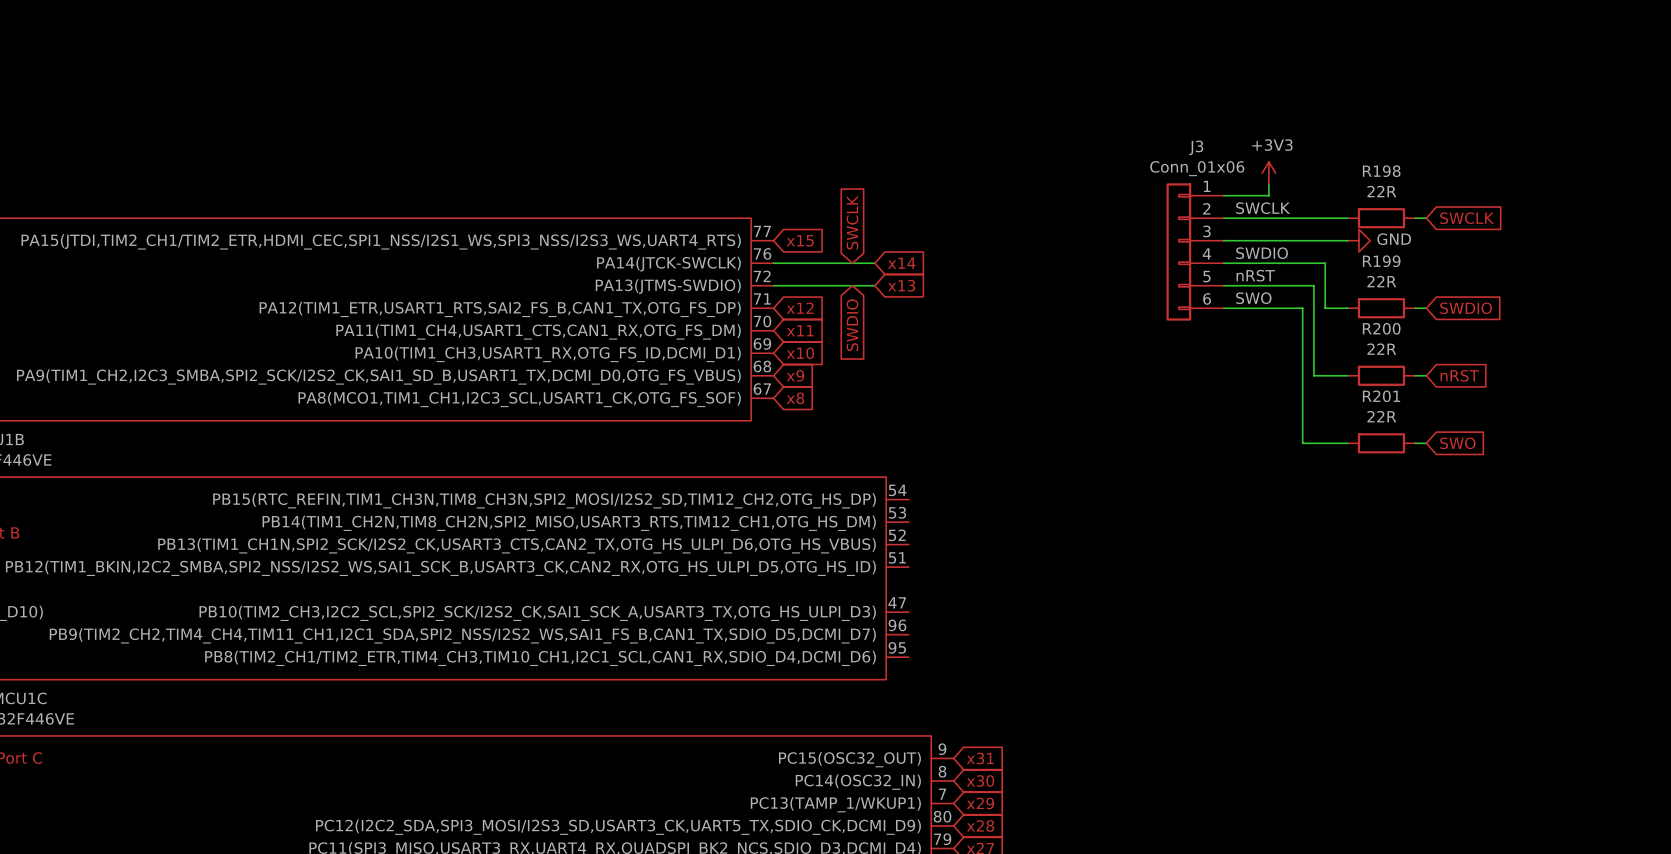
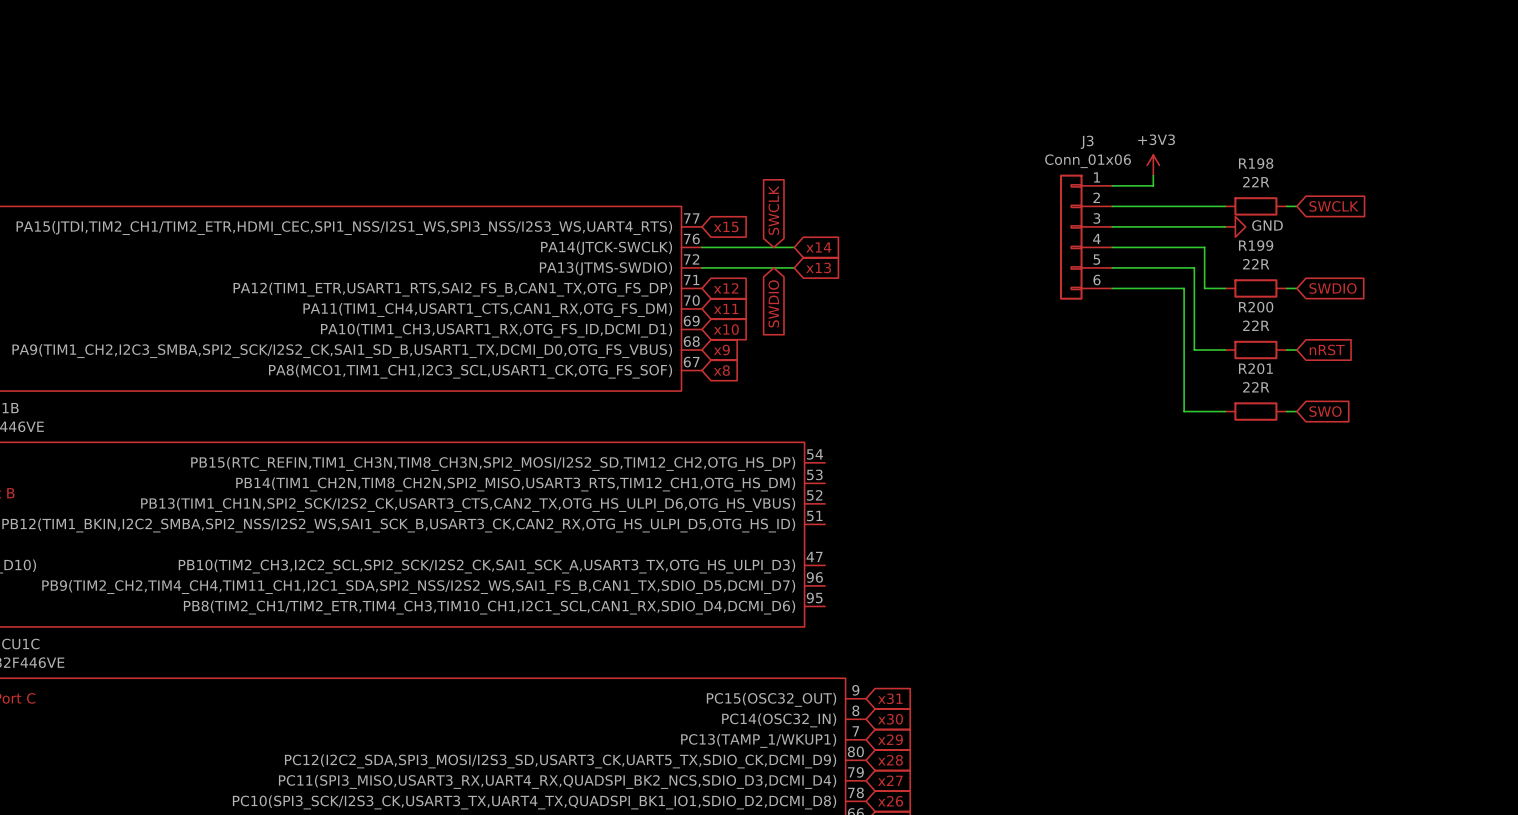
label: SWCLK (1263, 208) -> none
label: SWDIO (1262, 253) -> none
label: nRST (1255, 275) -> none
label: SWO (1253, 298) -> none

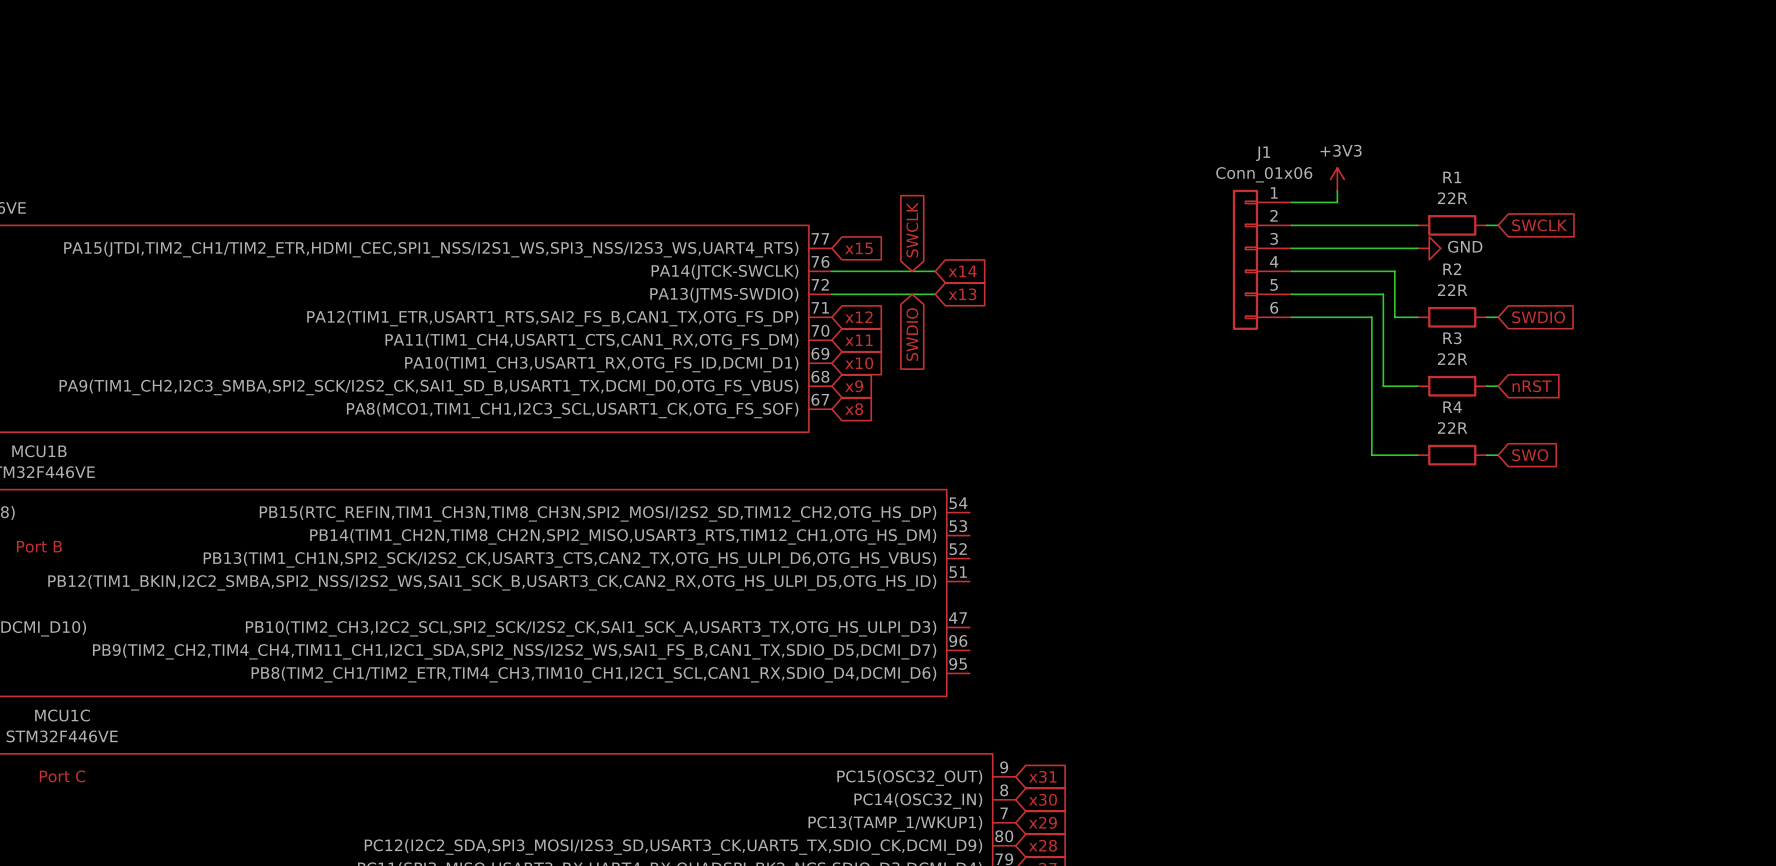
J3 name: J3 (1087, 142) -> J1 (1263, 153)
R198 name: R198 (1256, 163) -> R1 (1452, 177)
R199 name: R199 (1256, 245) -> R2 (1452, 269)
R200 name: R200 (1256, 307) -> R3 (1452, 338)
R201 name: R201 (1255, 368) -> R4 (1452, 407)

